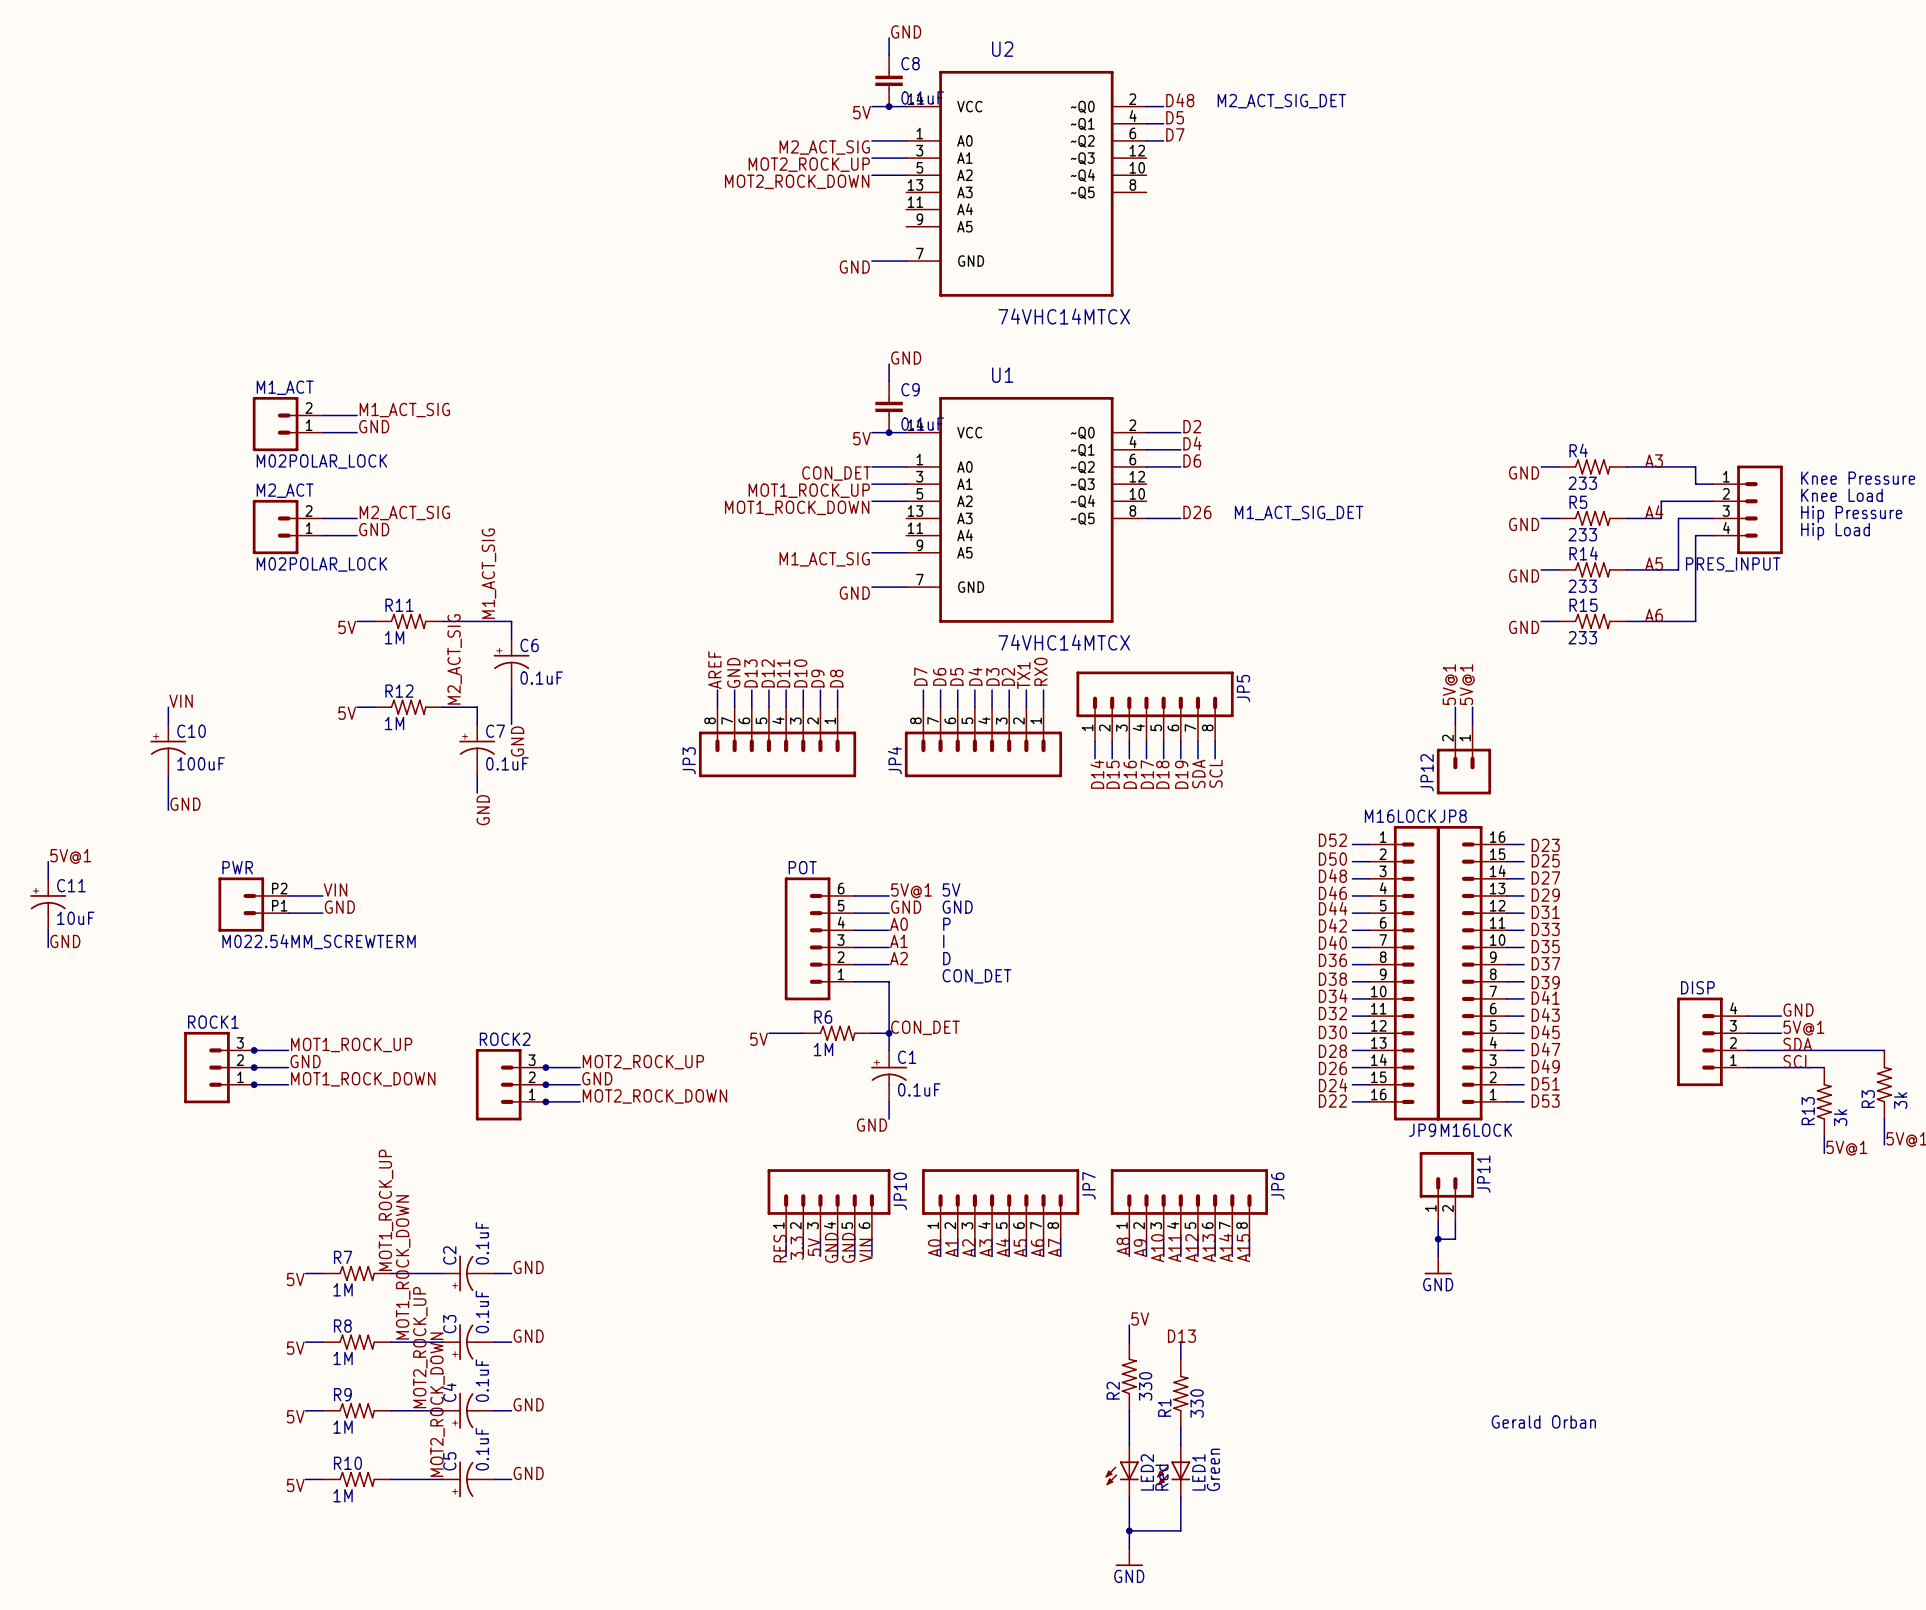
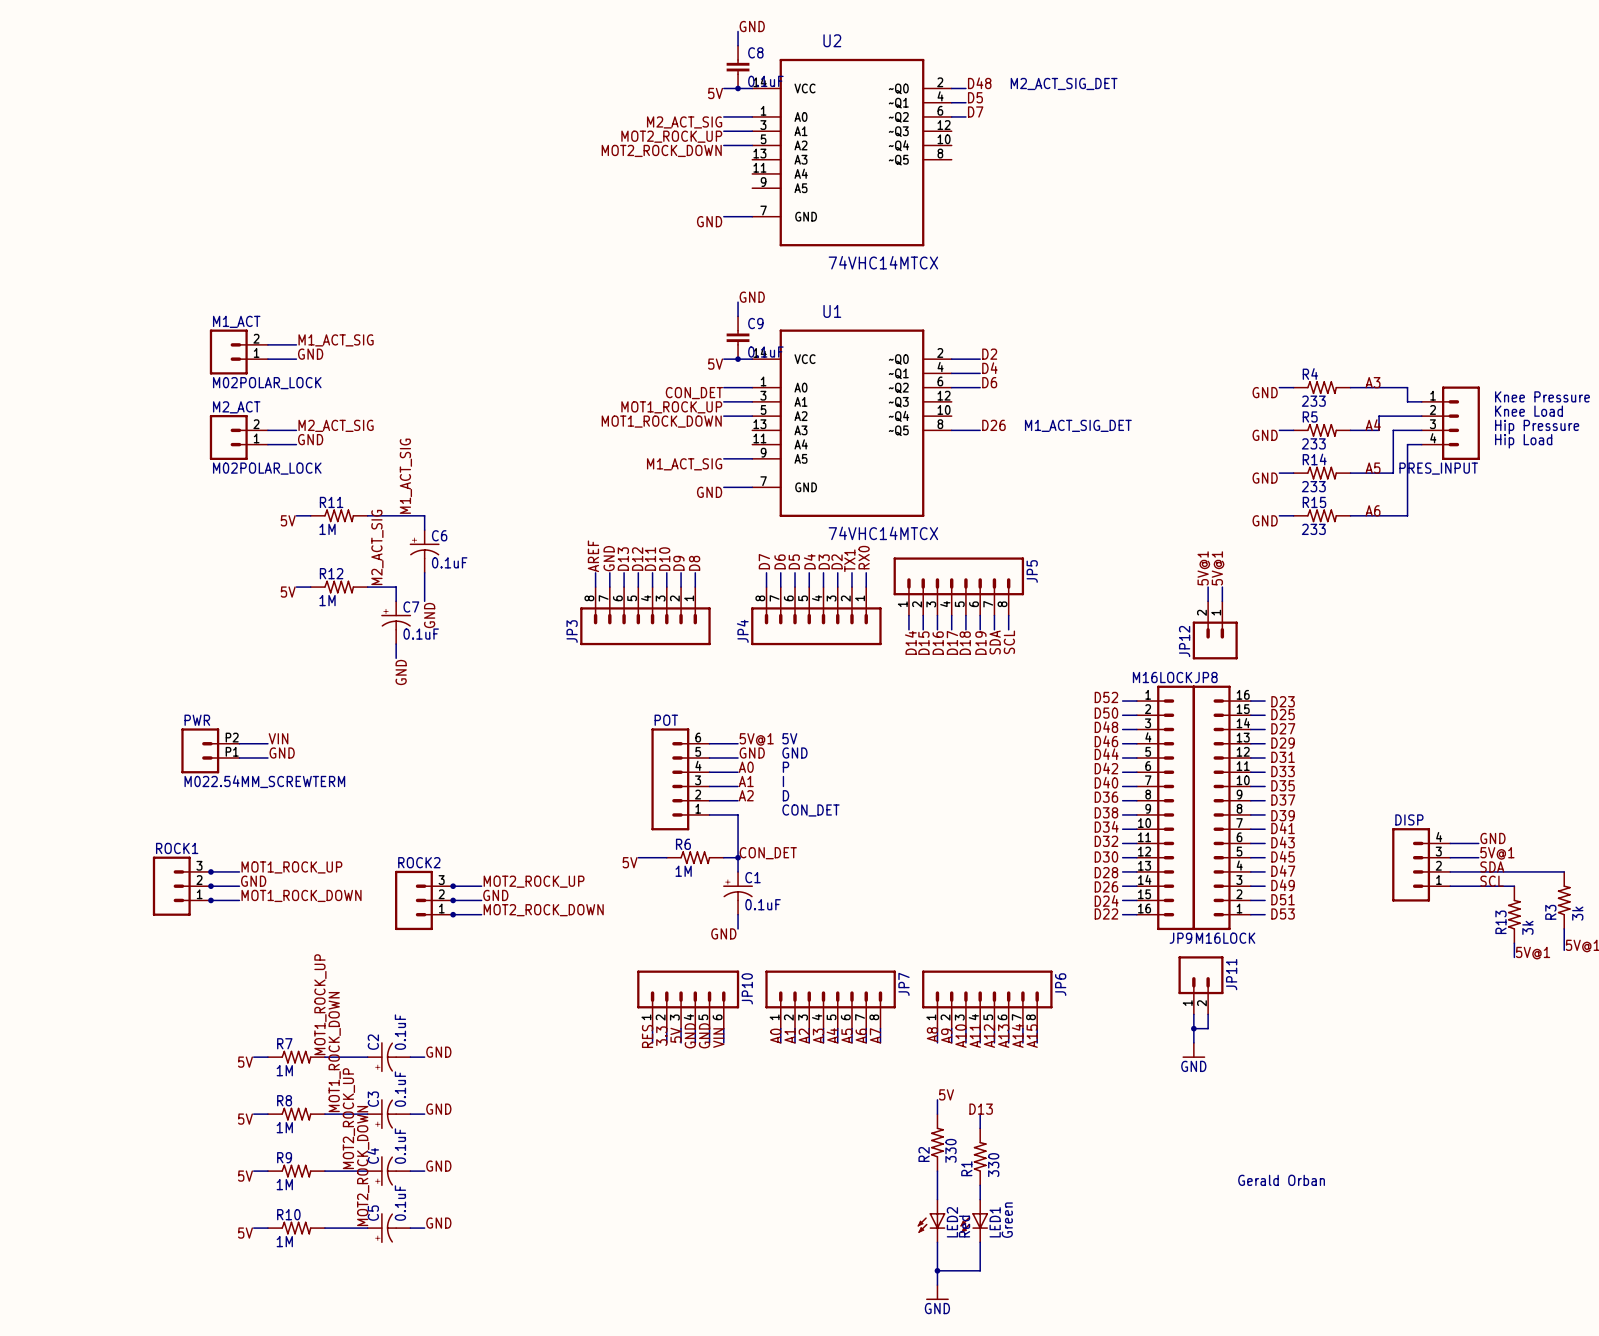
label: VIN (181, 701) -> none
wire: (168, 707) (168, 724) -> none
C10: 100uF (168, 750) -> none
wire: (168, 775) (168, 810) -> none
label: GND (185, 804) -> none
label: 5V@1 (70, 856) -> none
wire: (48, 861) (48, 878) -> none
C11: 10uF (48, 904) -> none
wire: (48, 930) (48, 947) -> none
label: GND (65, 941) -> none

